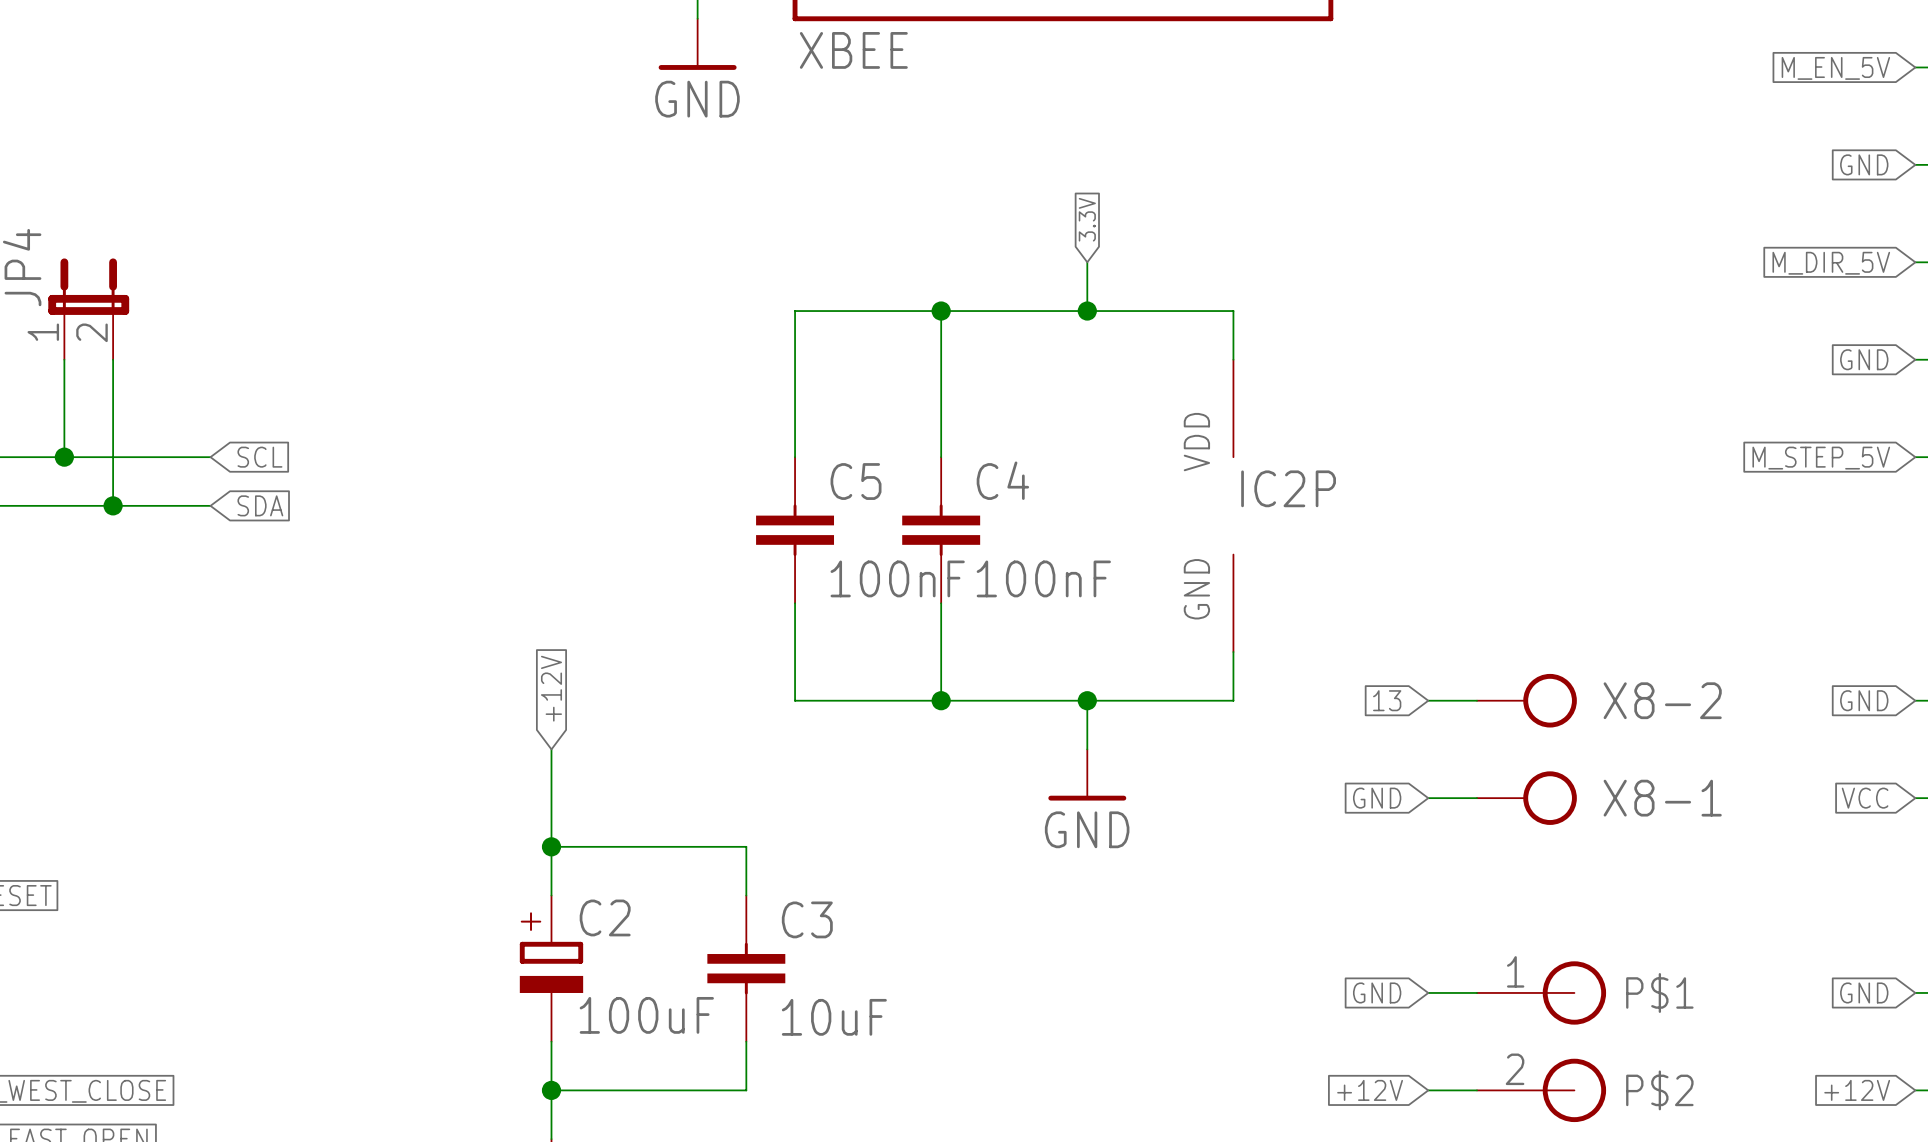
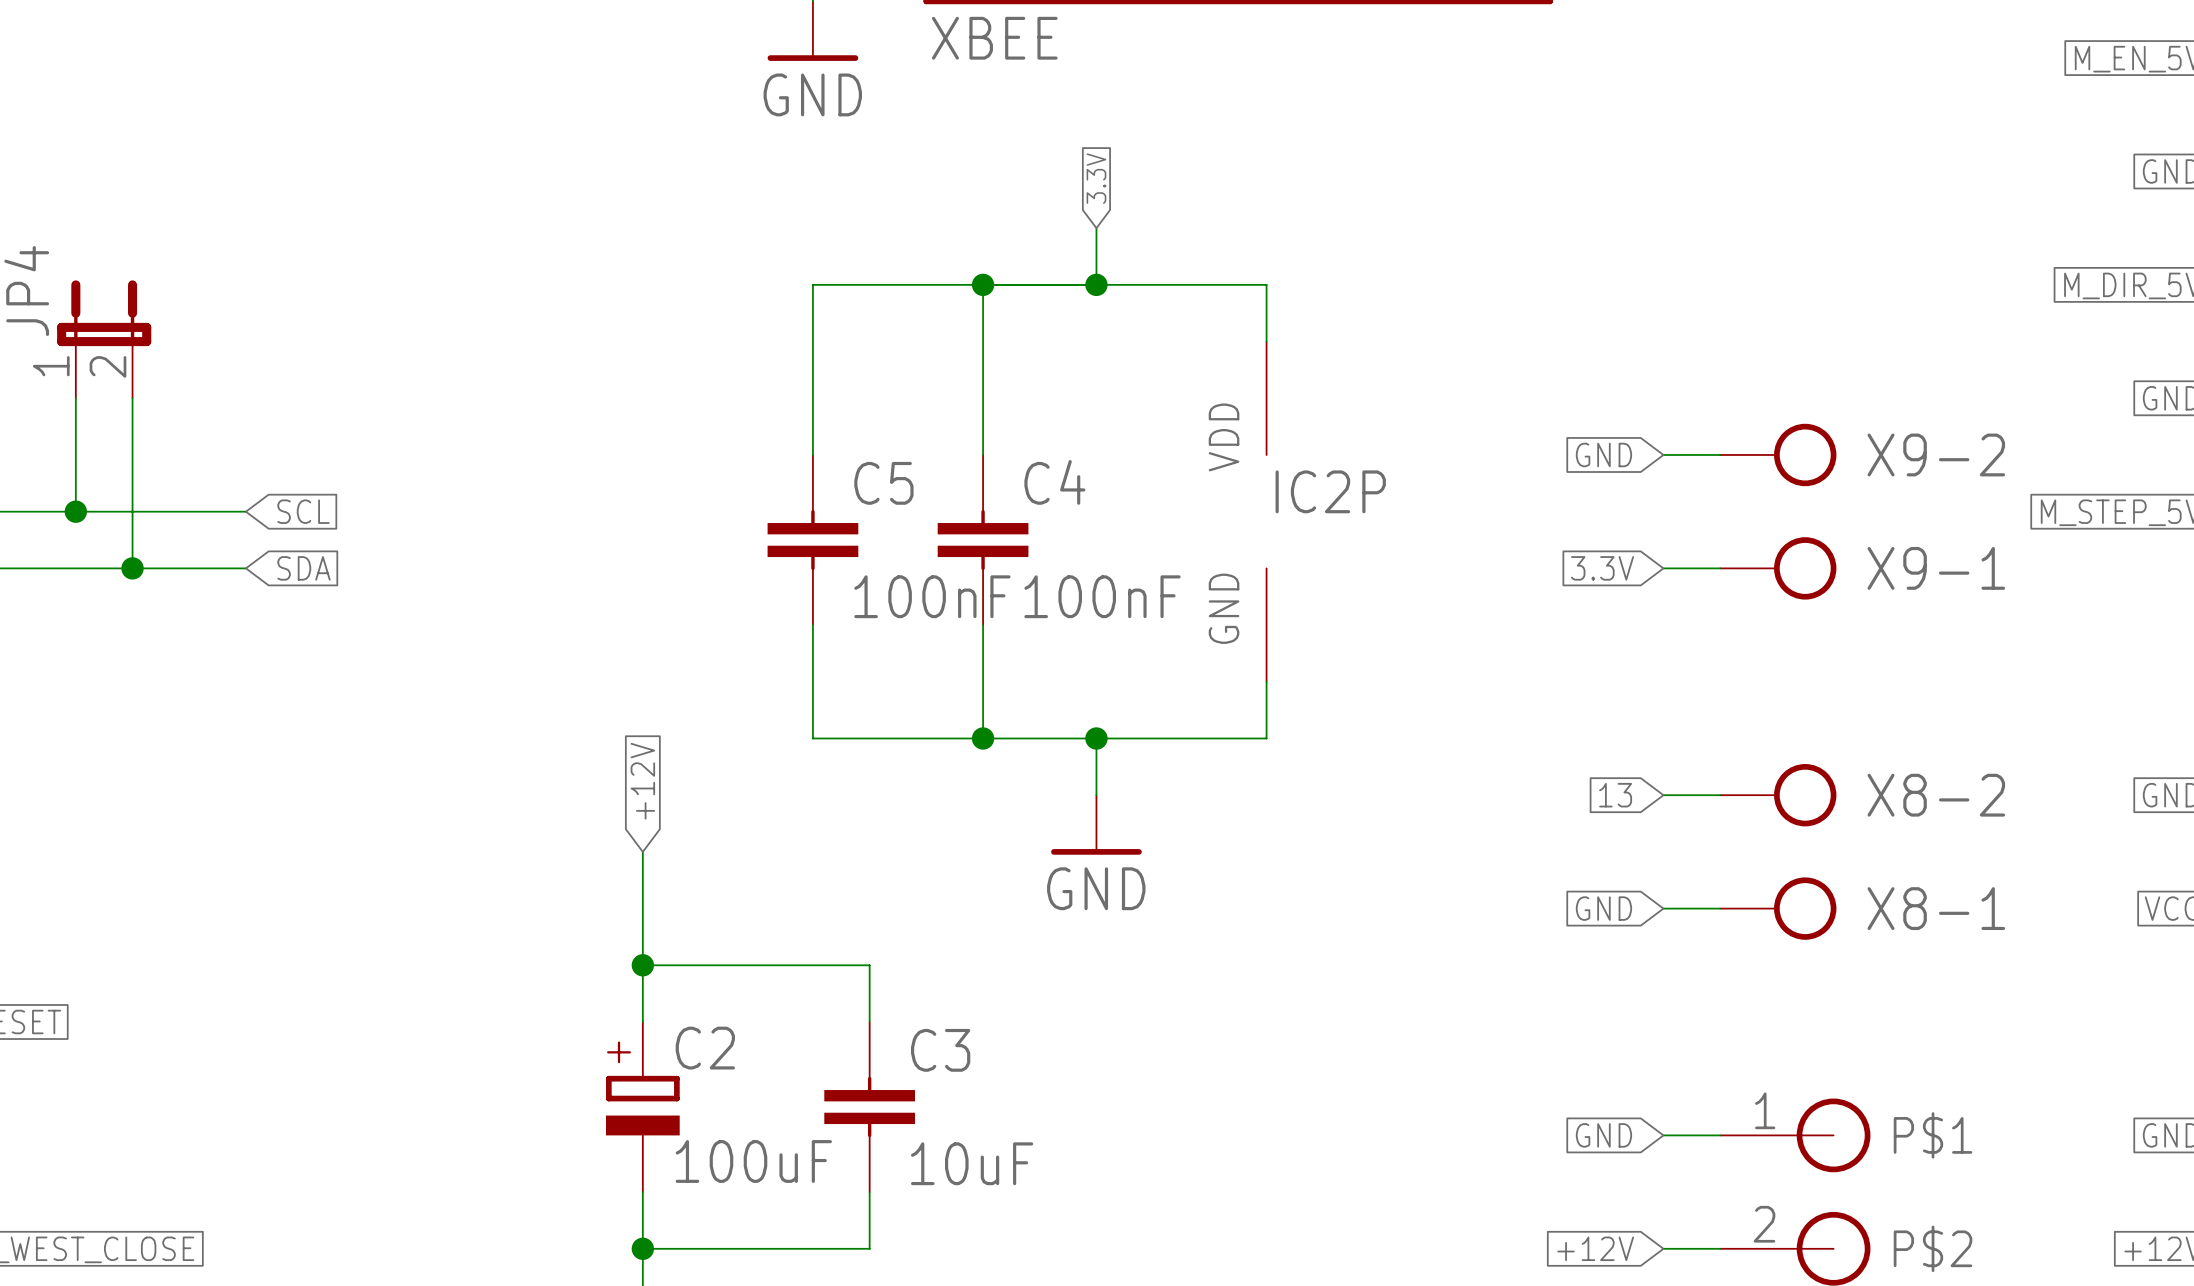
global label position: 3.3V (1087, 219) -> 3.3V (1096, 178)
junction: none -> (983, 284)
wire: none -> (1266, 284) (812, 284) (812, 454)
wire: (941, 311) (941, 457) -> (983, 284) (983, 454)
junction position: (941, 311) -> (1096, 284)
junction: (1087, 311) -> none
wire: (1233, 359) (1233, 311) (795, 311) (795, 457) -> none
global label: none -> GND (1603, 454)
wire: none -> (1663, 454) (1720, 454)
X9-2: none -> (1778, 454)
IC2P position: (1233, 505) -> (1266, 511)
global label: none -> 3.3V (1602, 568)
wire: none -> (1663, 568) (1720, 568)
X9-1: none -> (1778, 568)
C5 position: (795, 530) -> (812, 540)
C4 position: (941, 530) -> (983, 540)
wire: none -> (812, 625) (812, 738) (1266, 738) (1266, 681)
wire: none -> (983, 625) (983, 738)
wire: (795, 603) (795, 700) (1233, 700) (1233, 652) -> none
wire: (941, 603) (941, 652) -> (1096, 228) (1096, 284)
junction: none -> (983, 738)
junction position: (941, 700) -> (1096, 738)
wire: (1087, 700) (1087, 749) -> none
junction: (1087, 700) -> none
power symbol position: GND (1087, 775) -> GND (1096, 824)

